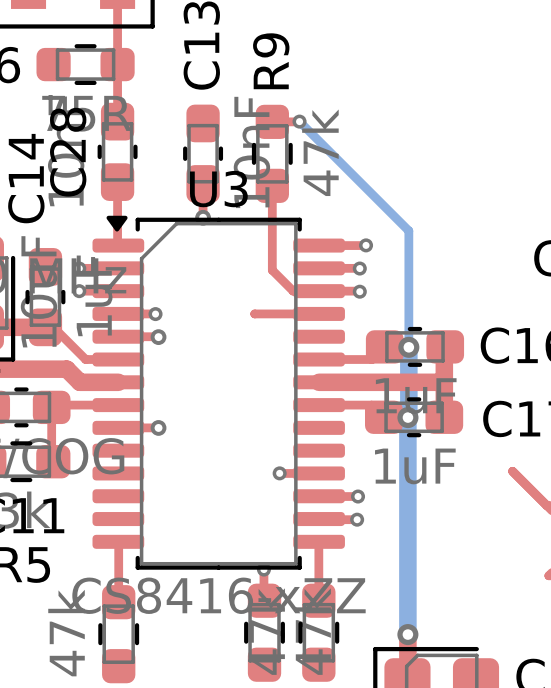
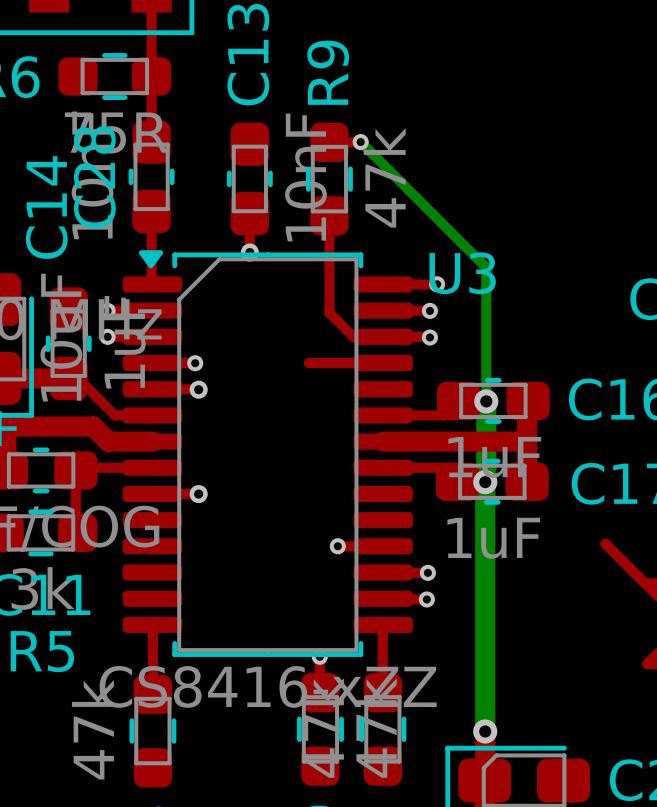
U3 name position: U3 (218, 189) -> U3 (462, 273)

